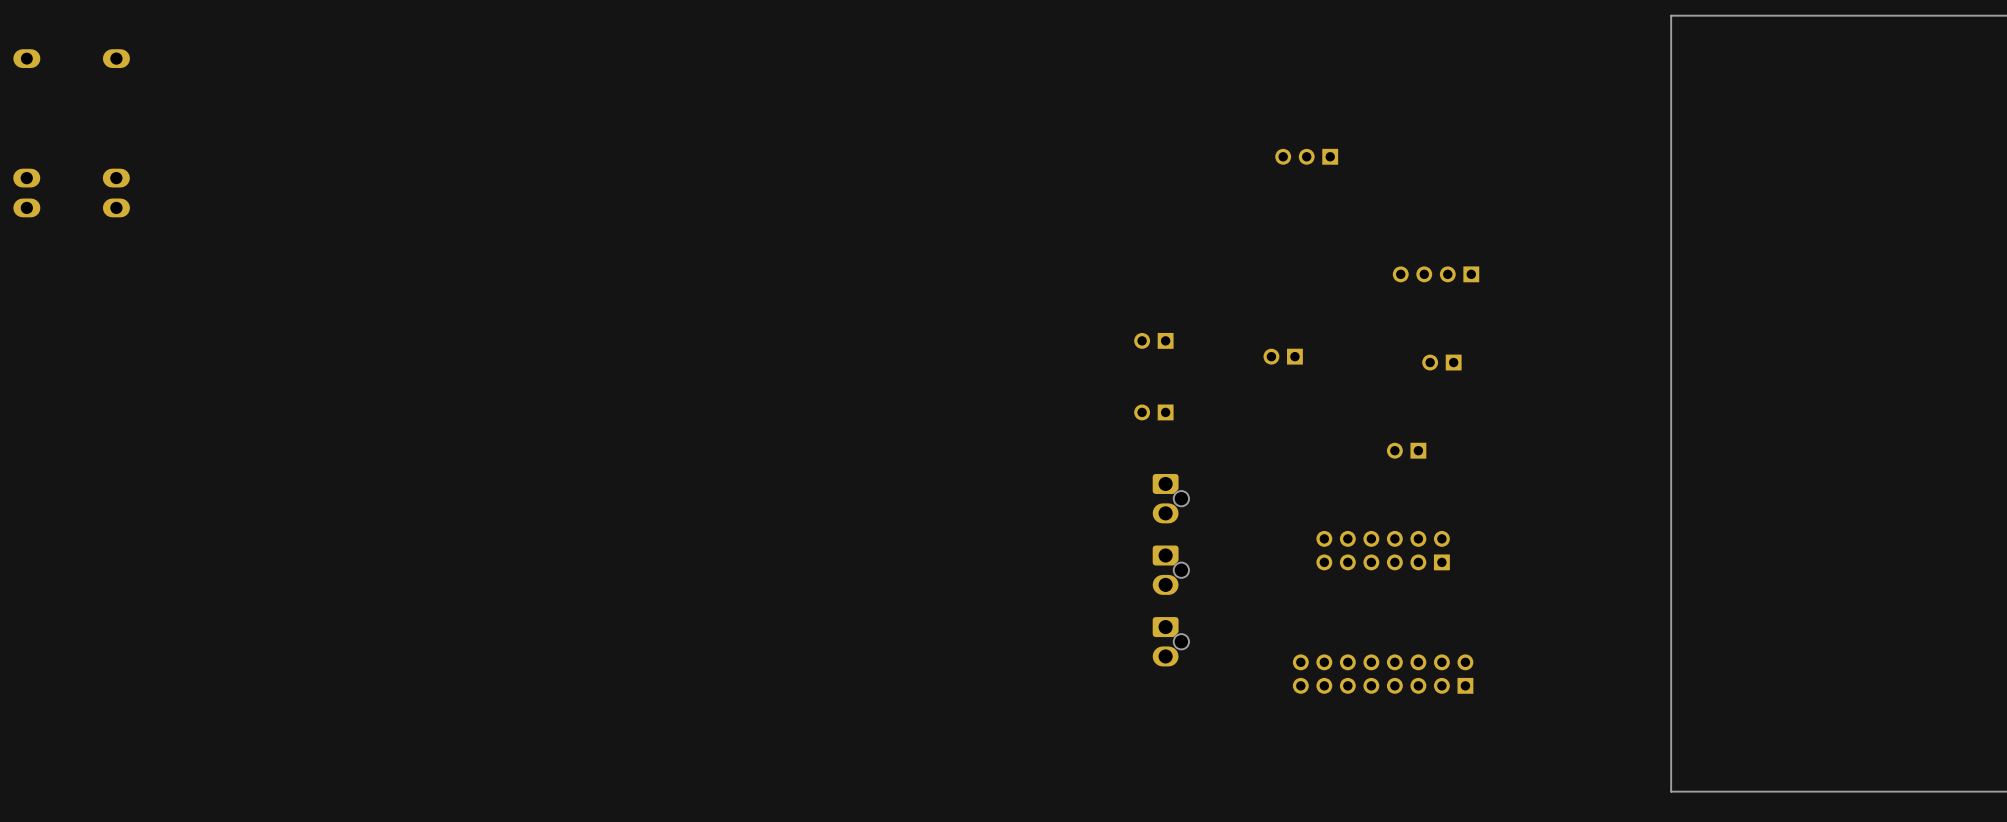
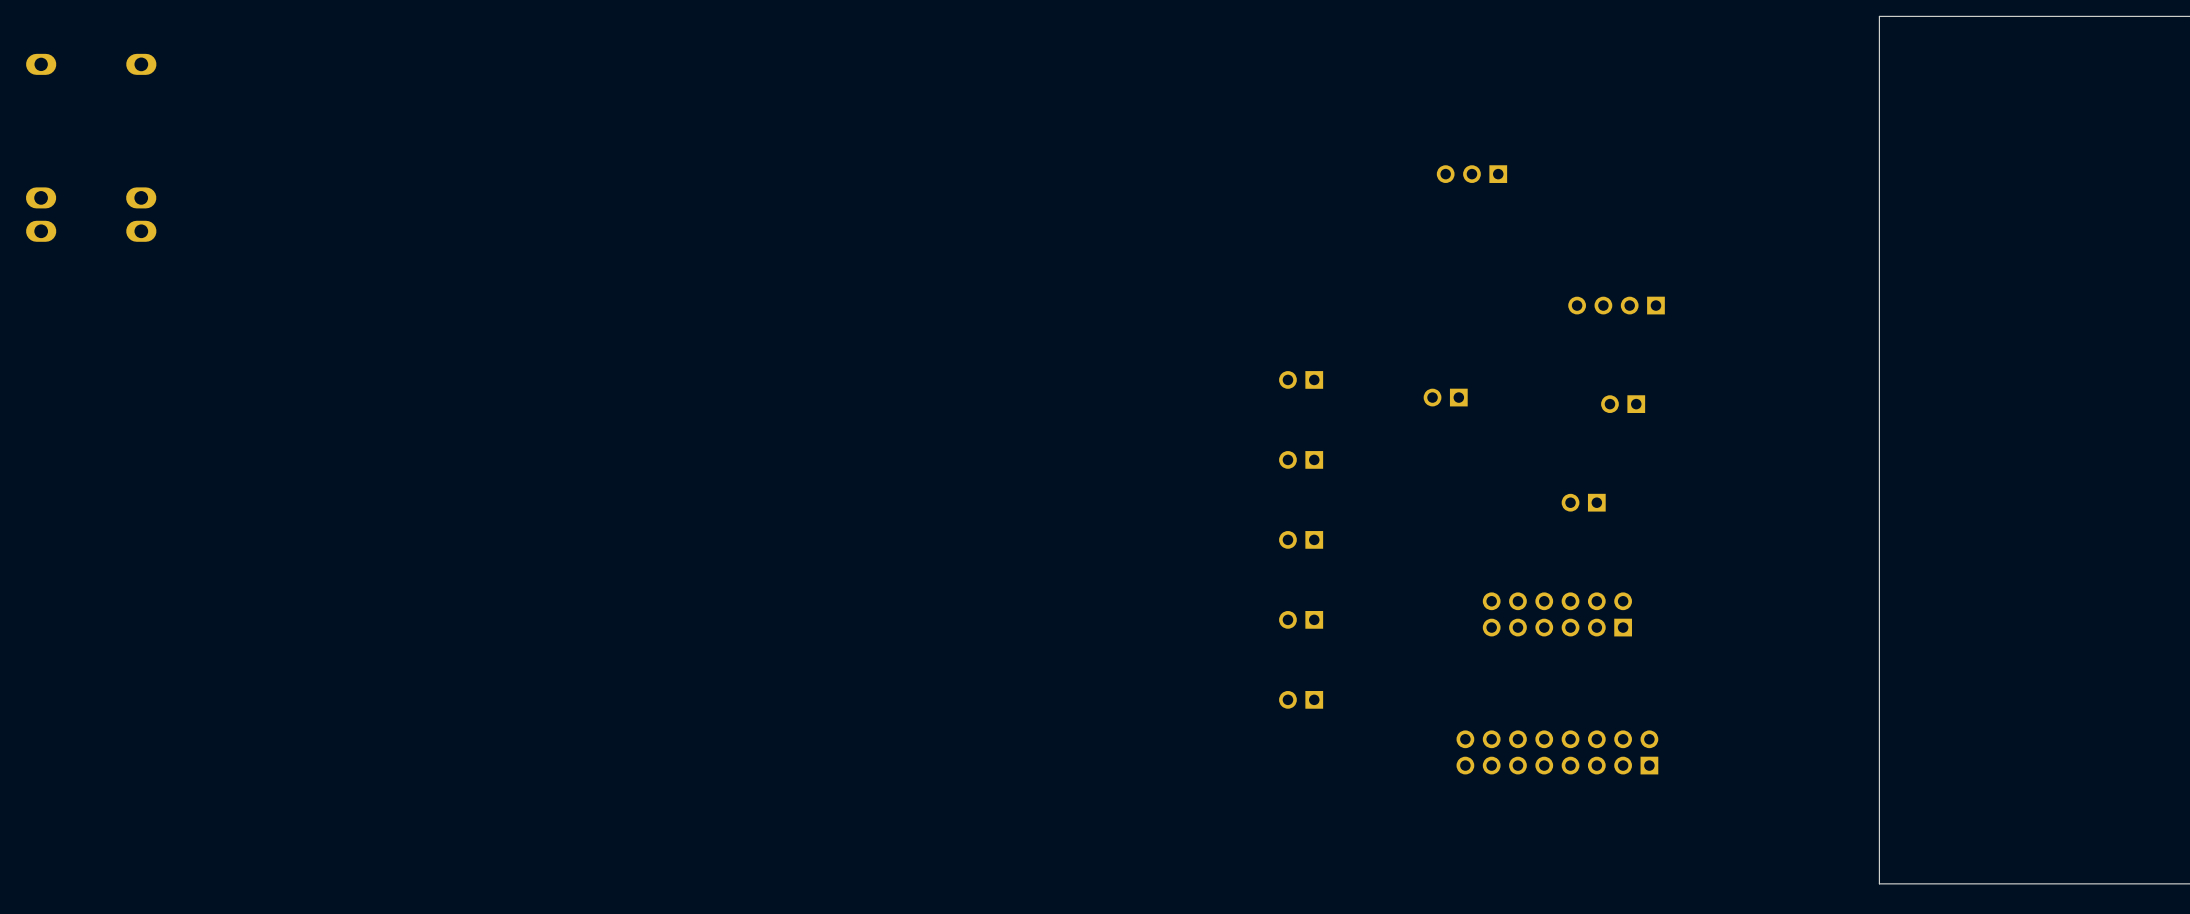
part: none -> (1301, 539)
part: (1170, 498) -> none
part: none -> (1301, 619)
part: (1170, 570) -> none
part: none -> (1301, 699)
part: (1170, 641) -> none

